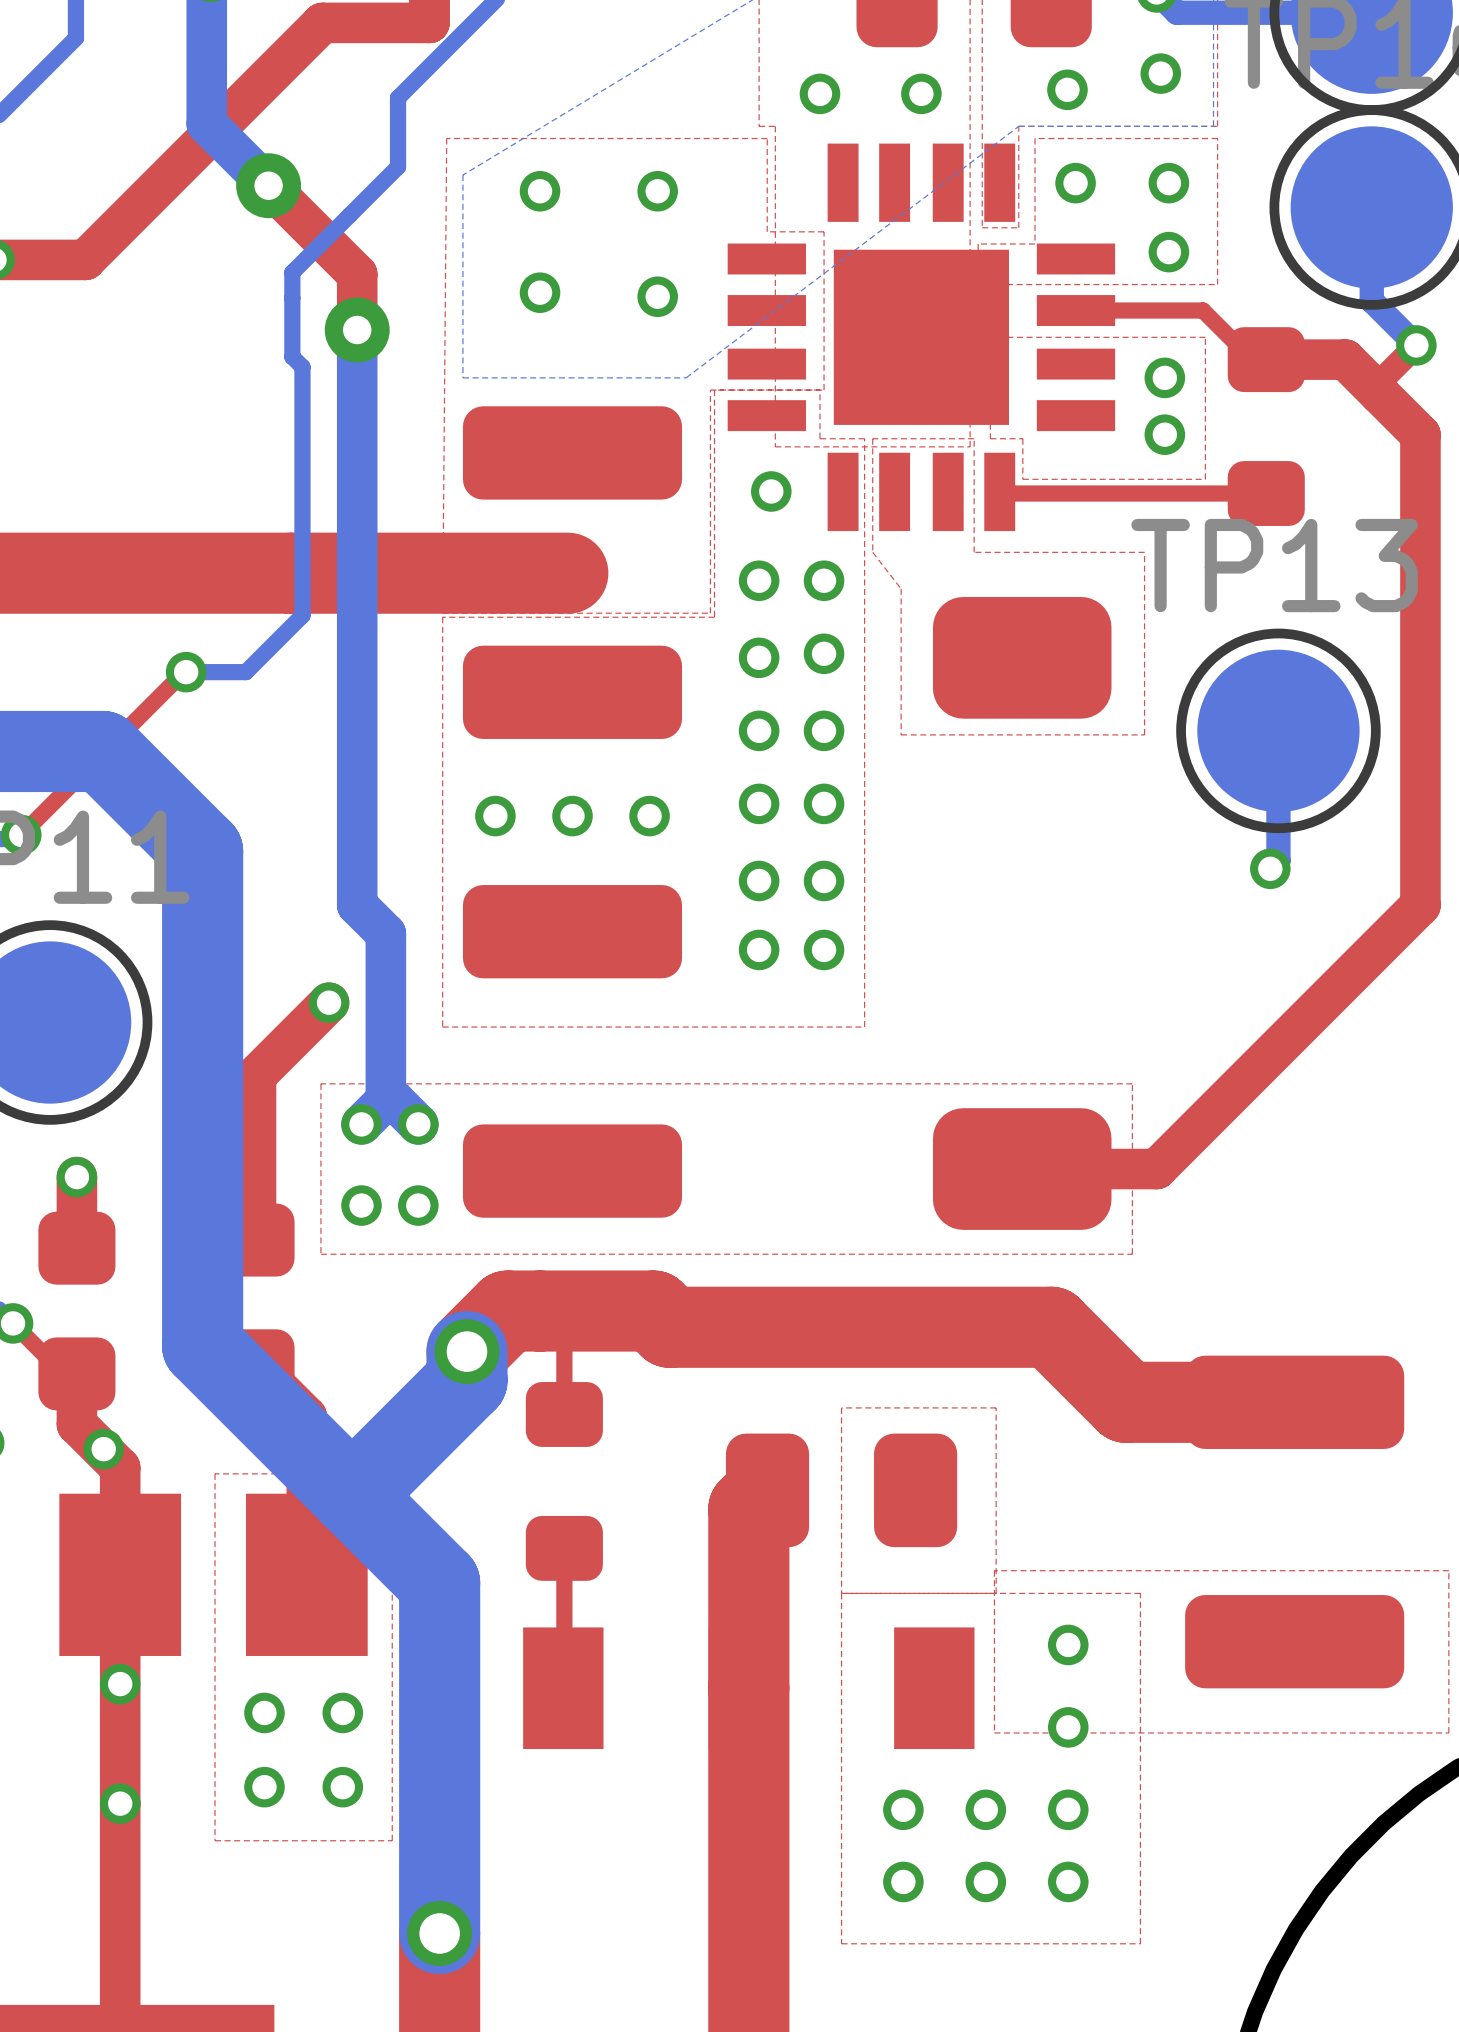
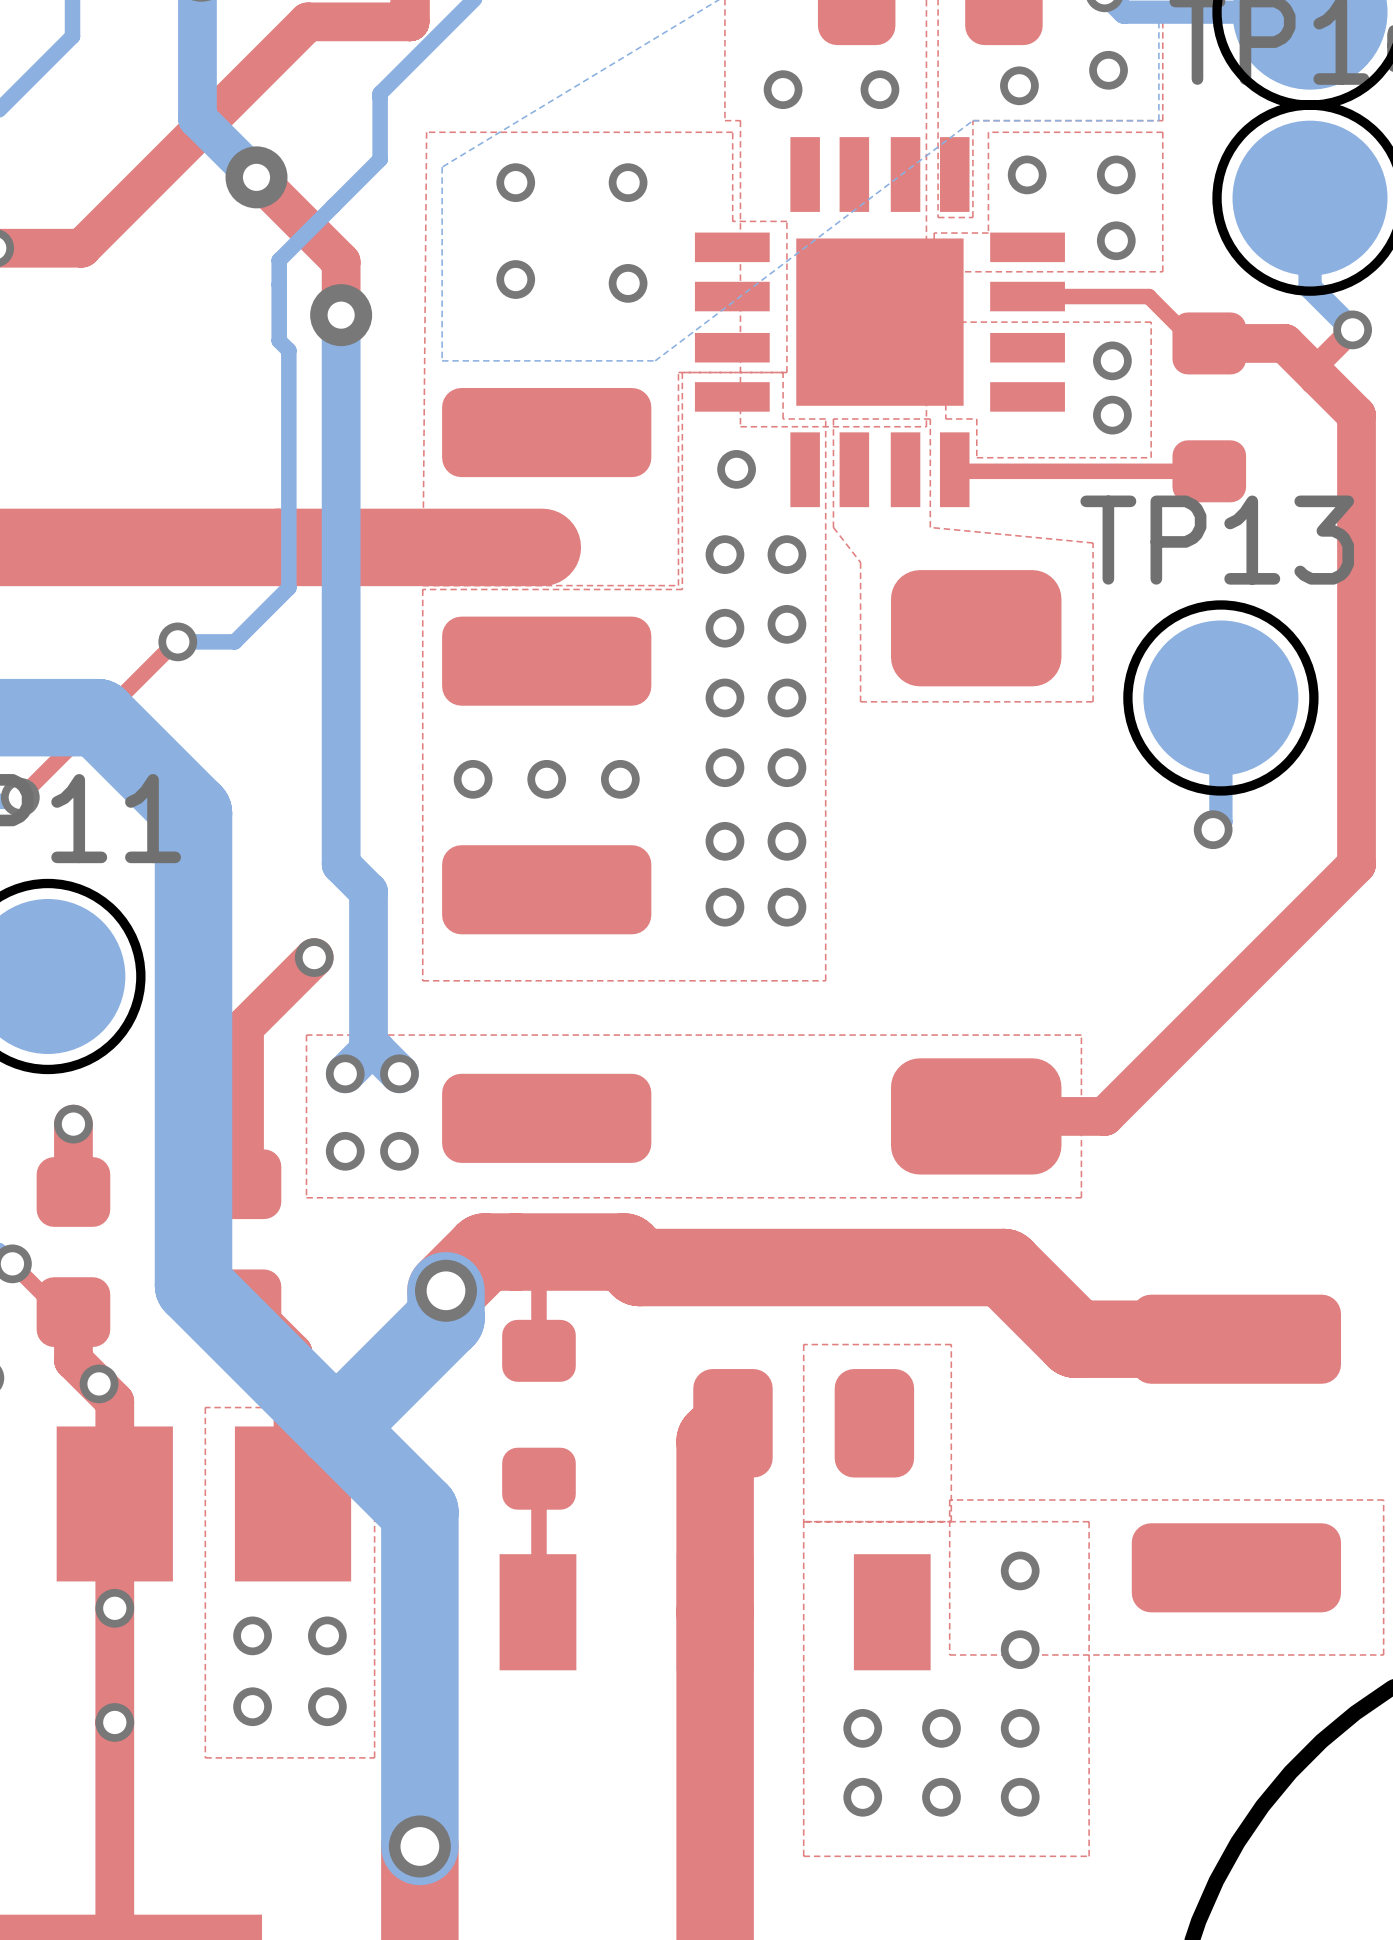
top zone outline: (974, 552) (1144, 552) (1144, 568) -> (930, 527) (1093, 542)

